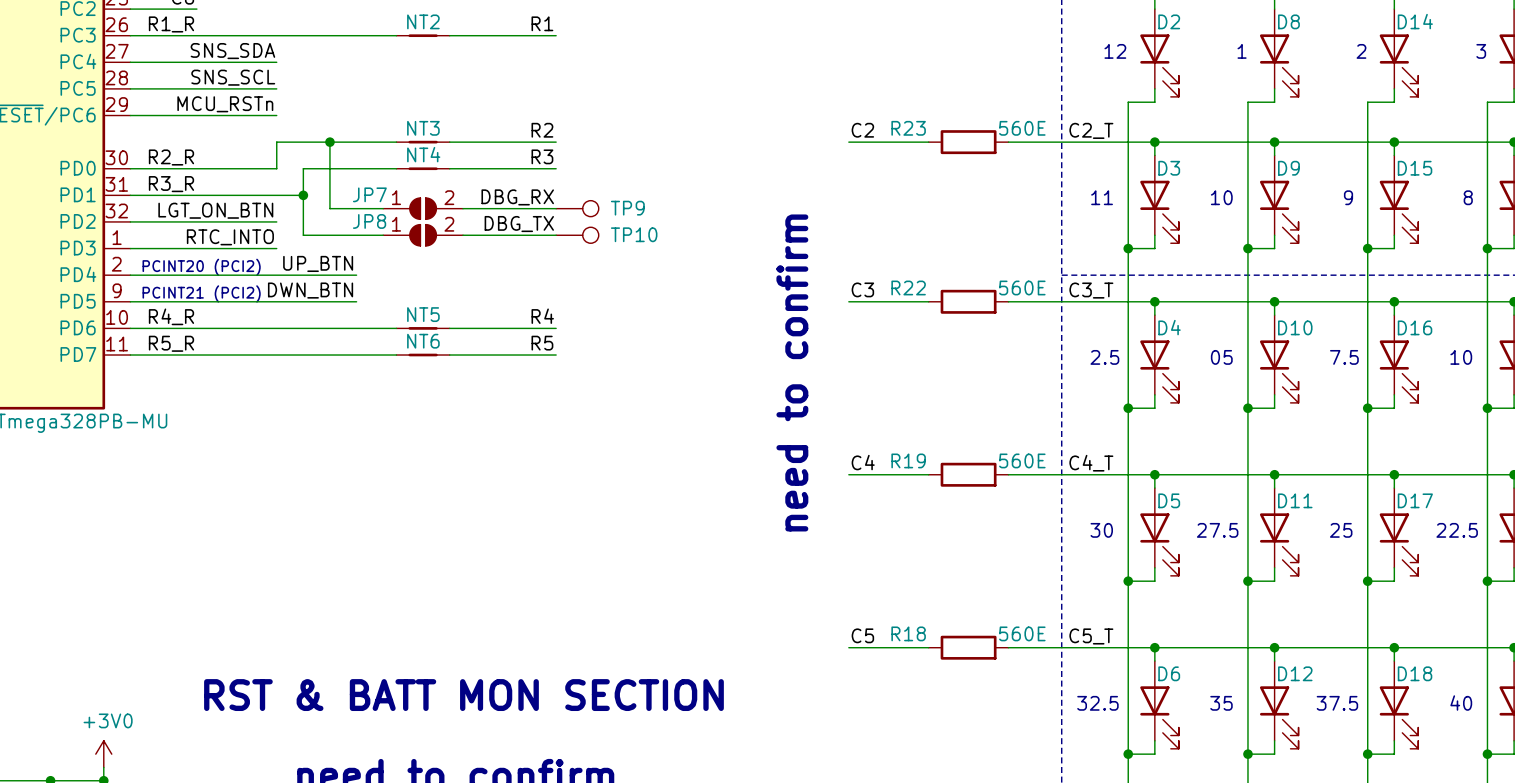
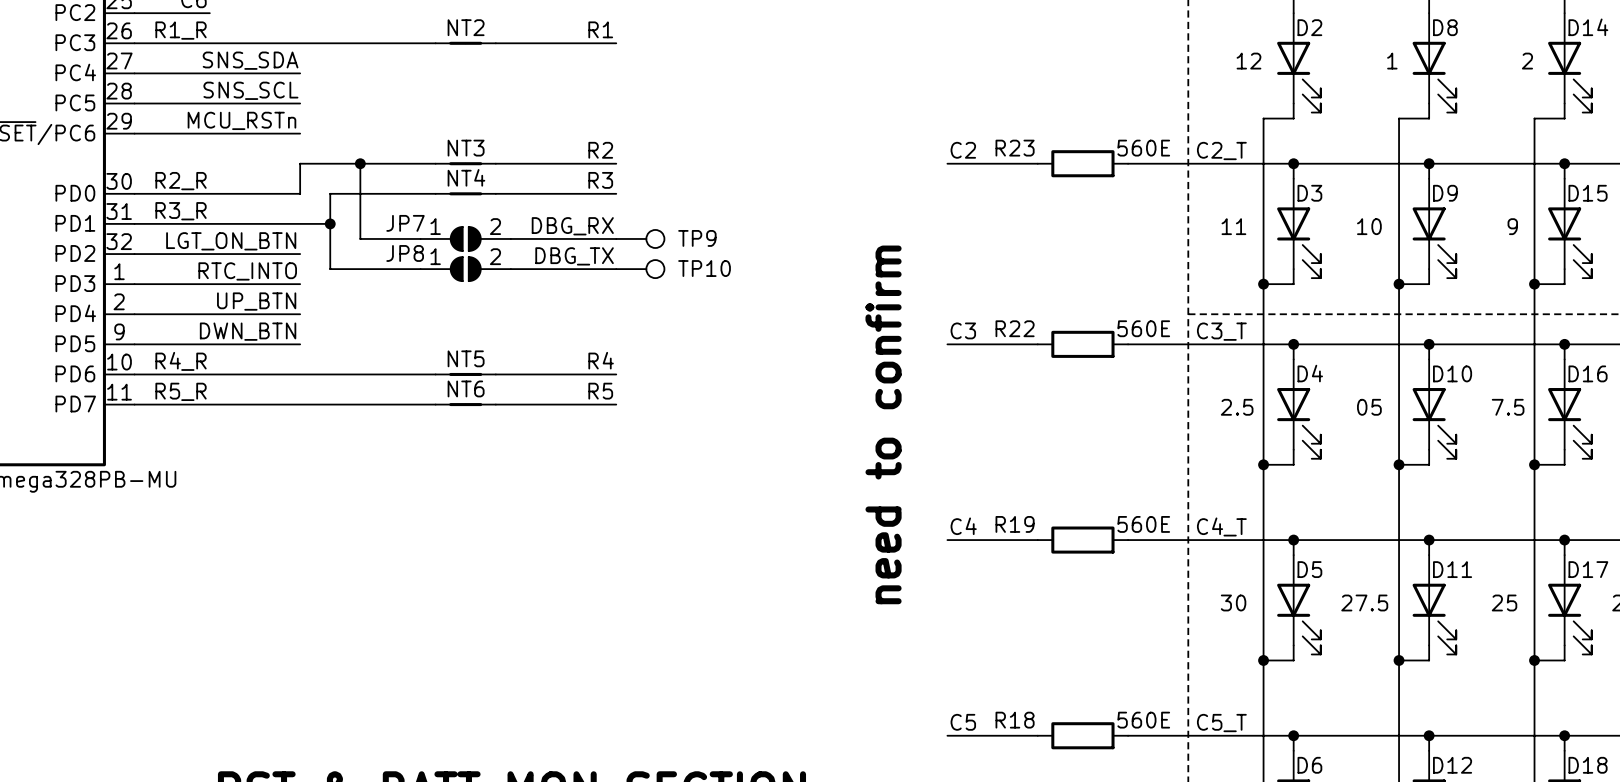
label position: UP_BTN (318, 263) -> UP_BTN (256, 301)
text: PCINT20 (PCI2) (201, 267) -> none
wire: (276, 275) (356, 275) -> none
label position: DWN_BTN (310, 290) -> DWN_BTN (248, 331)
text: PCINT21 (PCI2) (201, 293) -> none
wire: (276, 301) (356, 301) -> none

